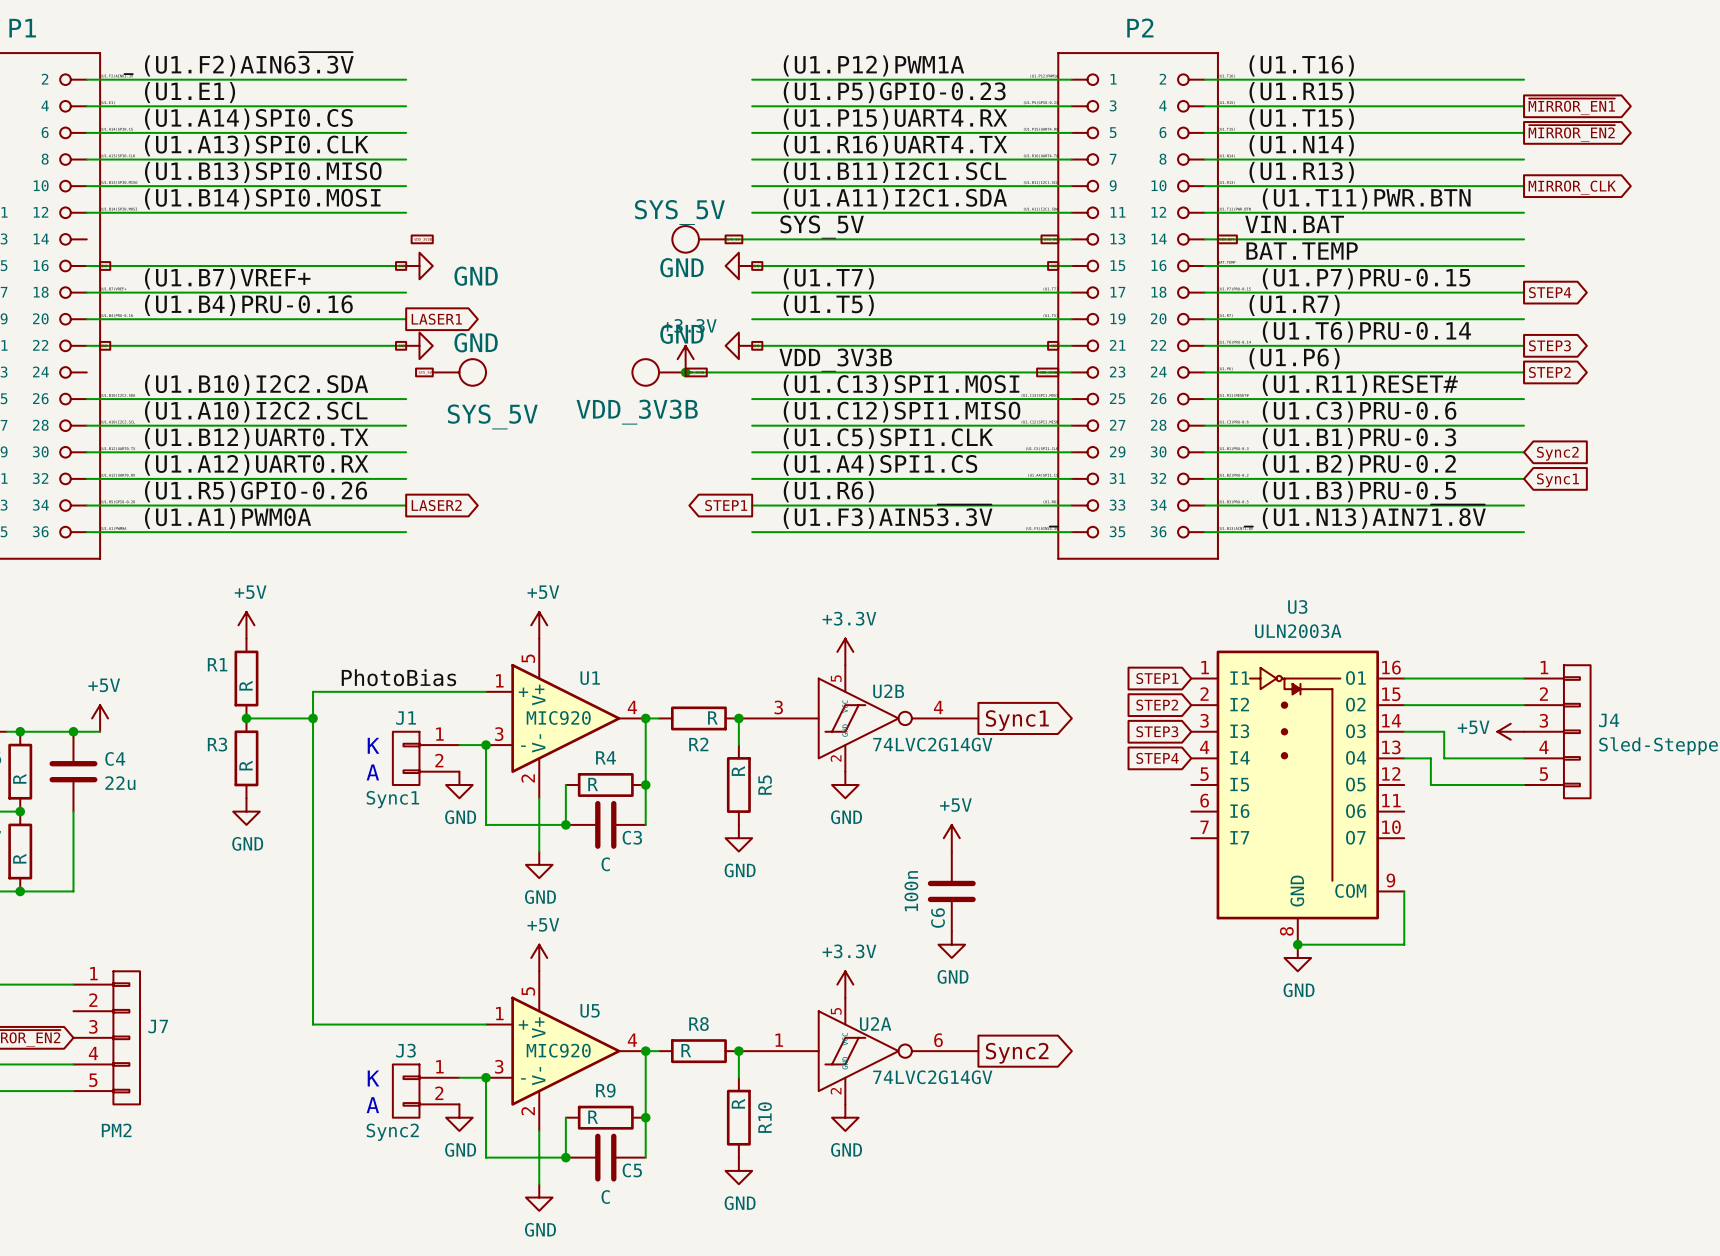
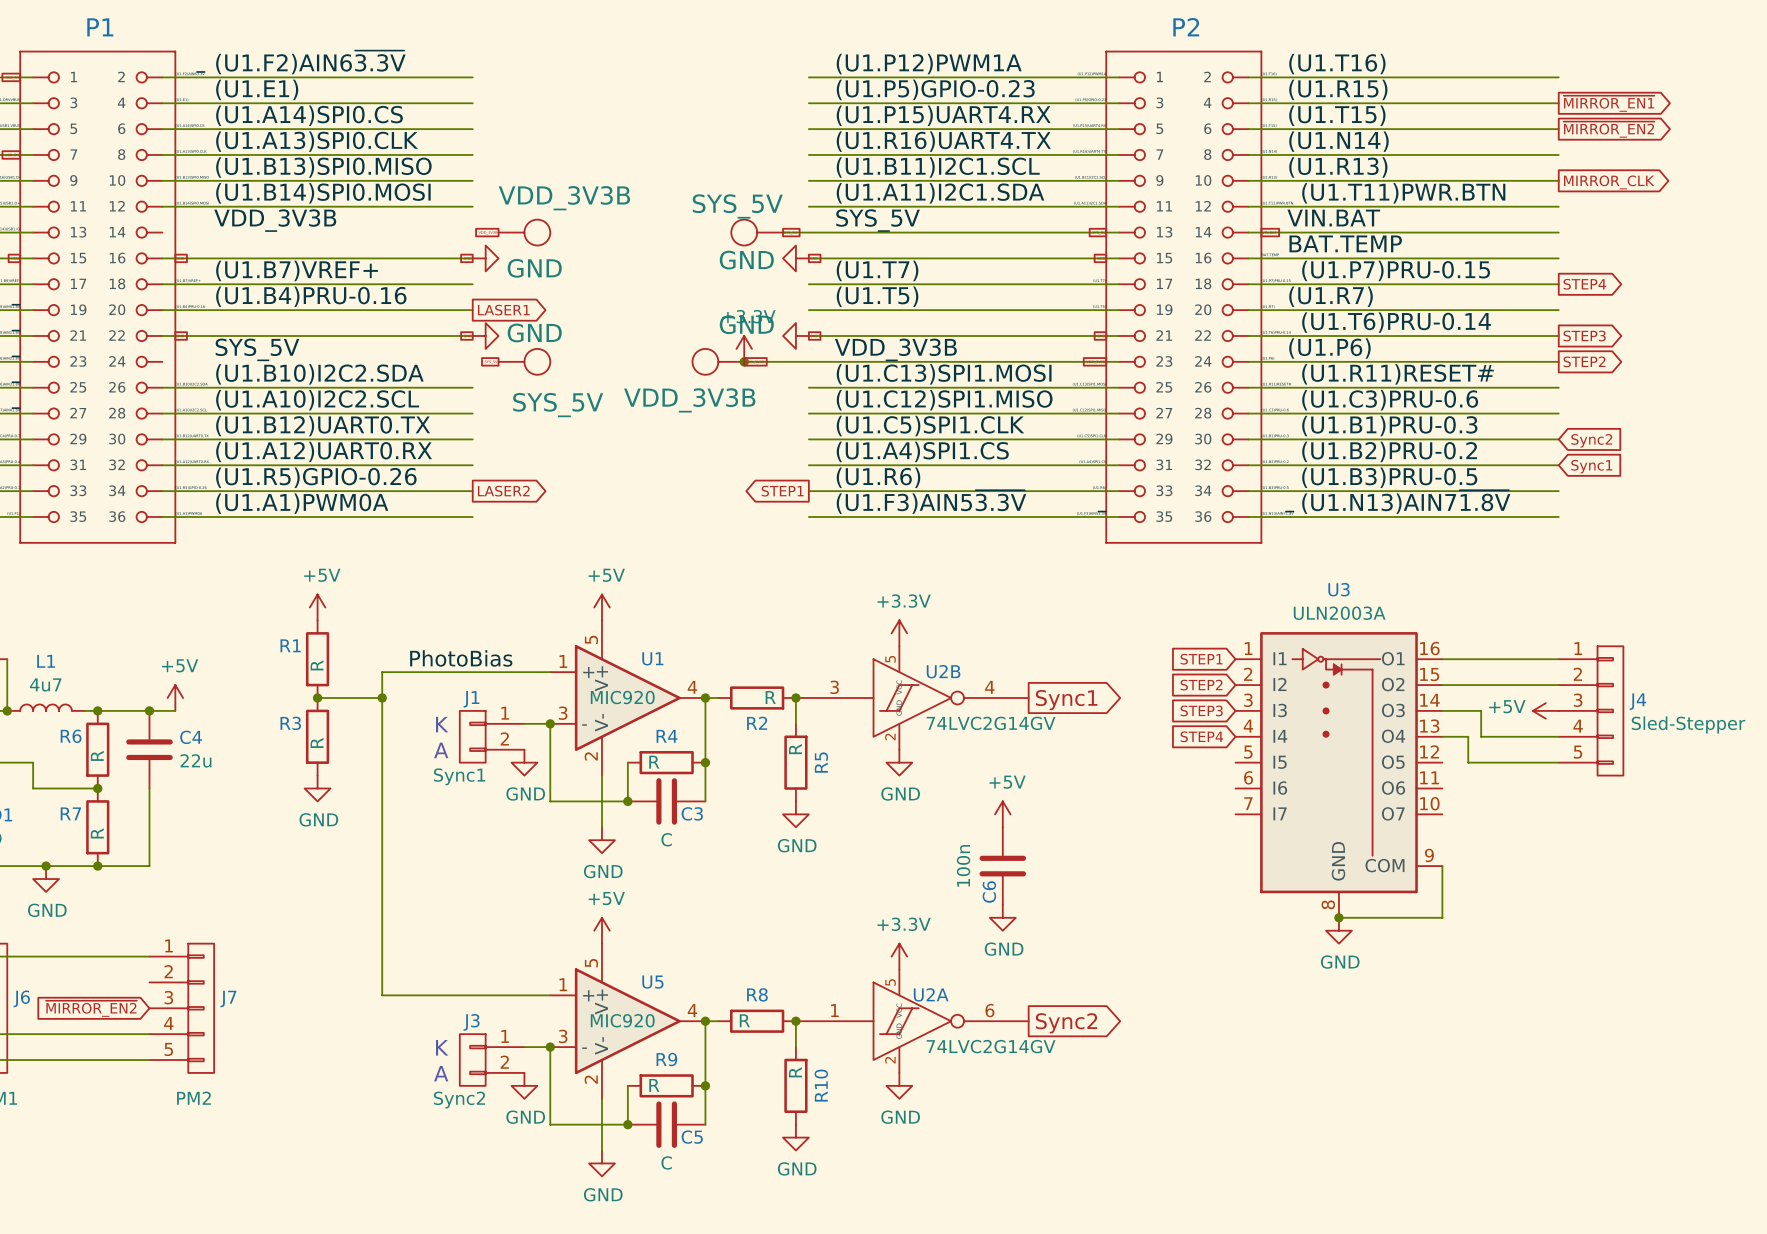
label: none -> VDD_3V3B (275, 220)
power symbol: none -> VDD_3V3B (524, 232)
label: none -> SYS_5V (257, 349)

